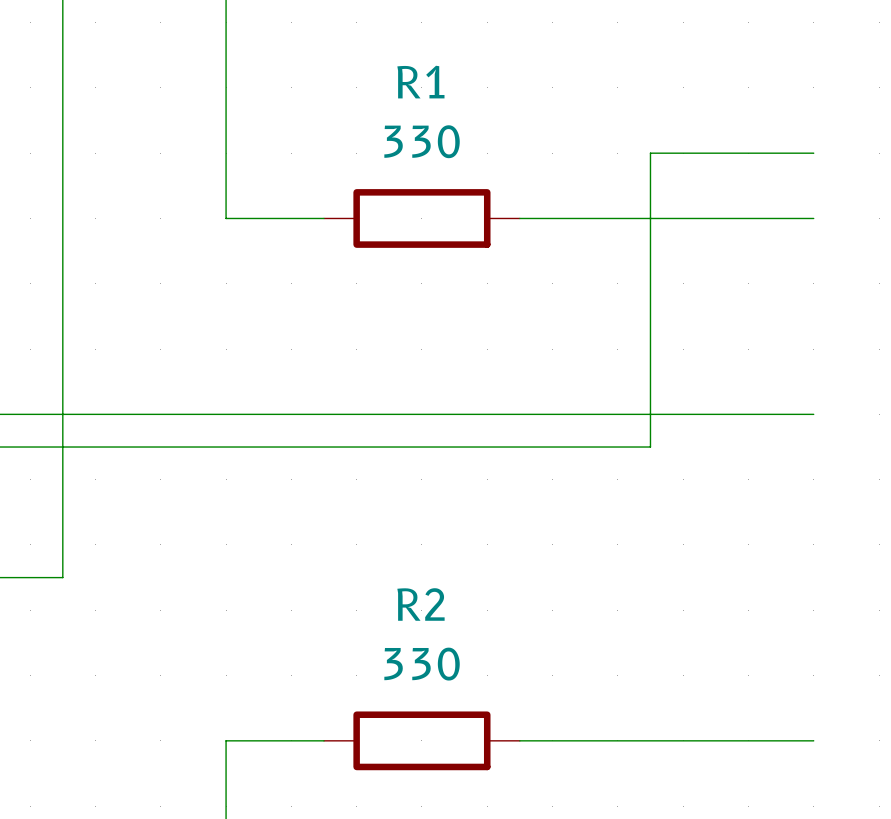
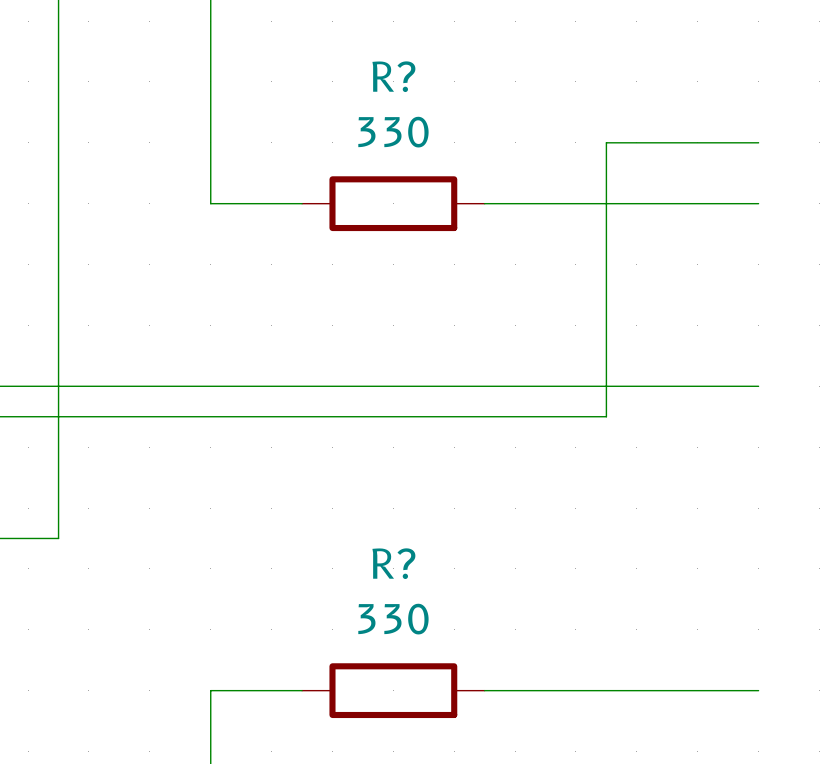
R1 name: R1 (420, 82) -> R? (393, 76)
R2 name: R2 (420, 604) -> R? (393, 563)

